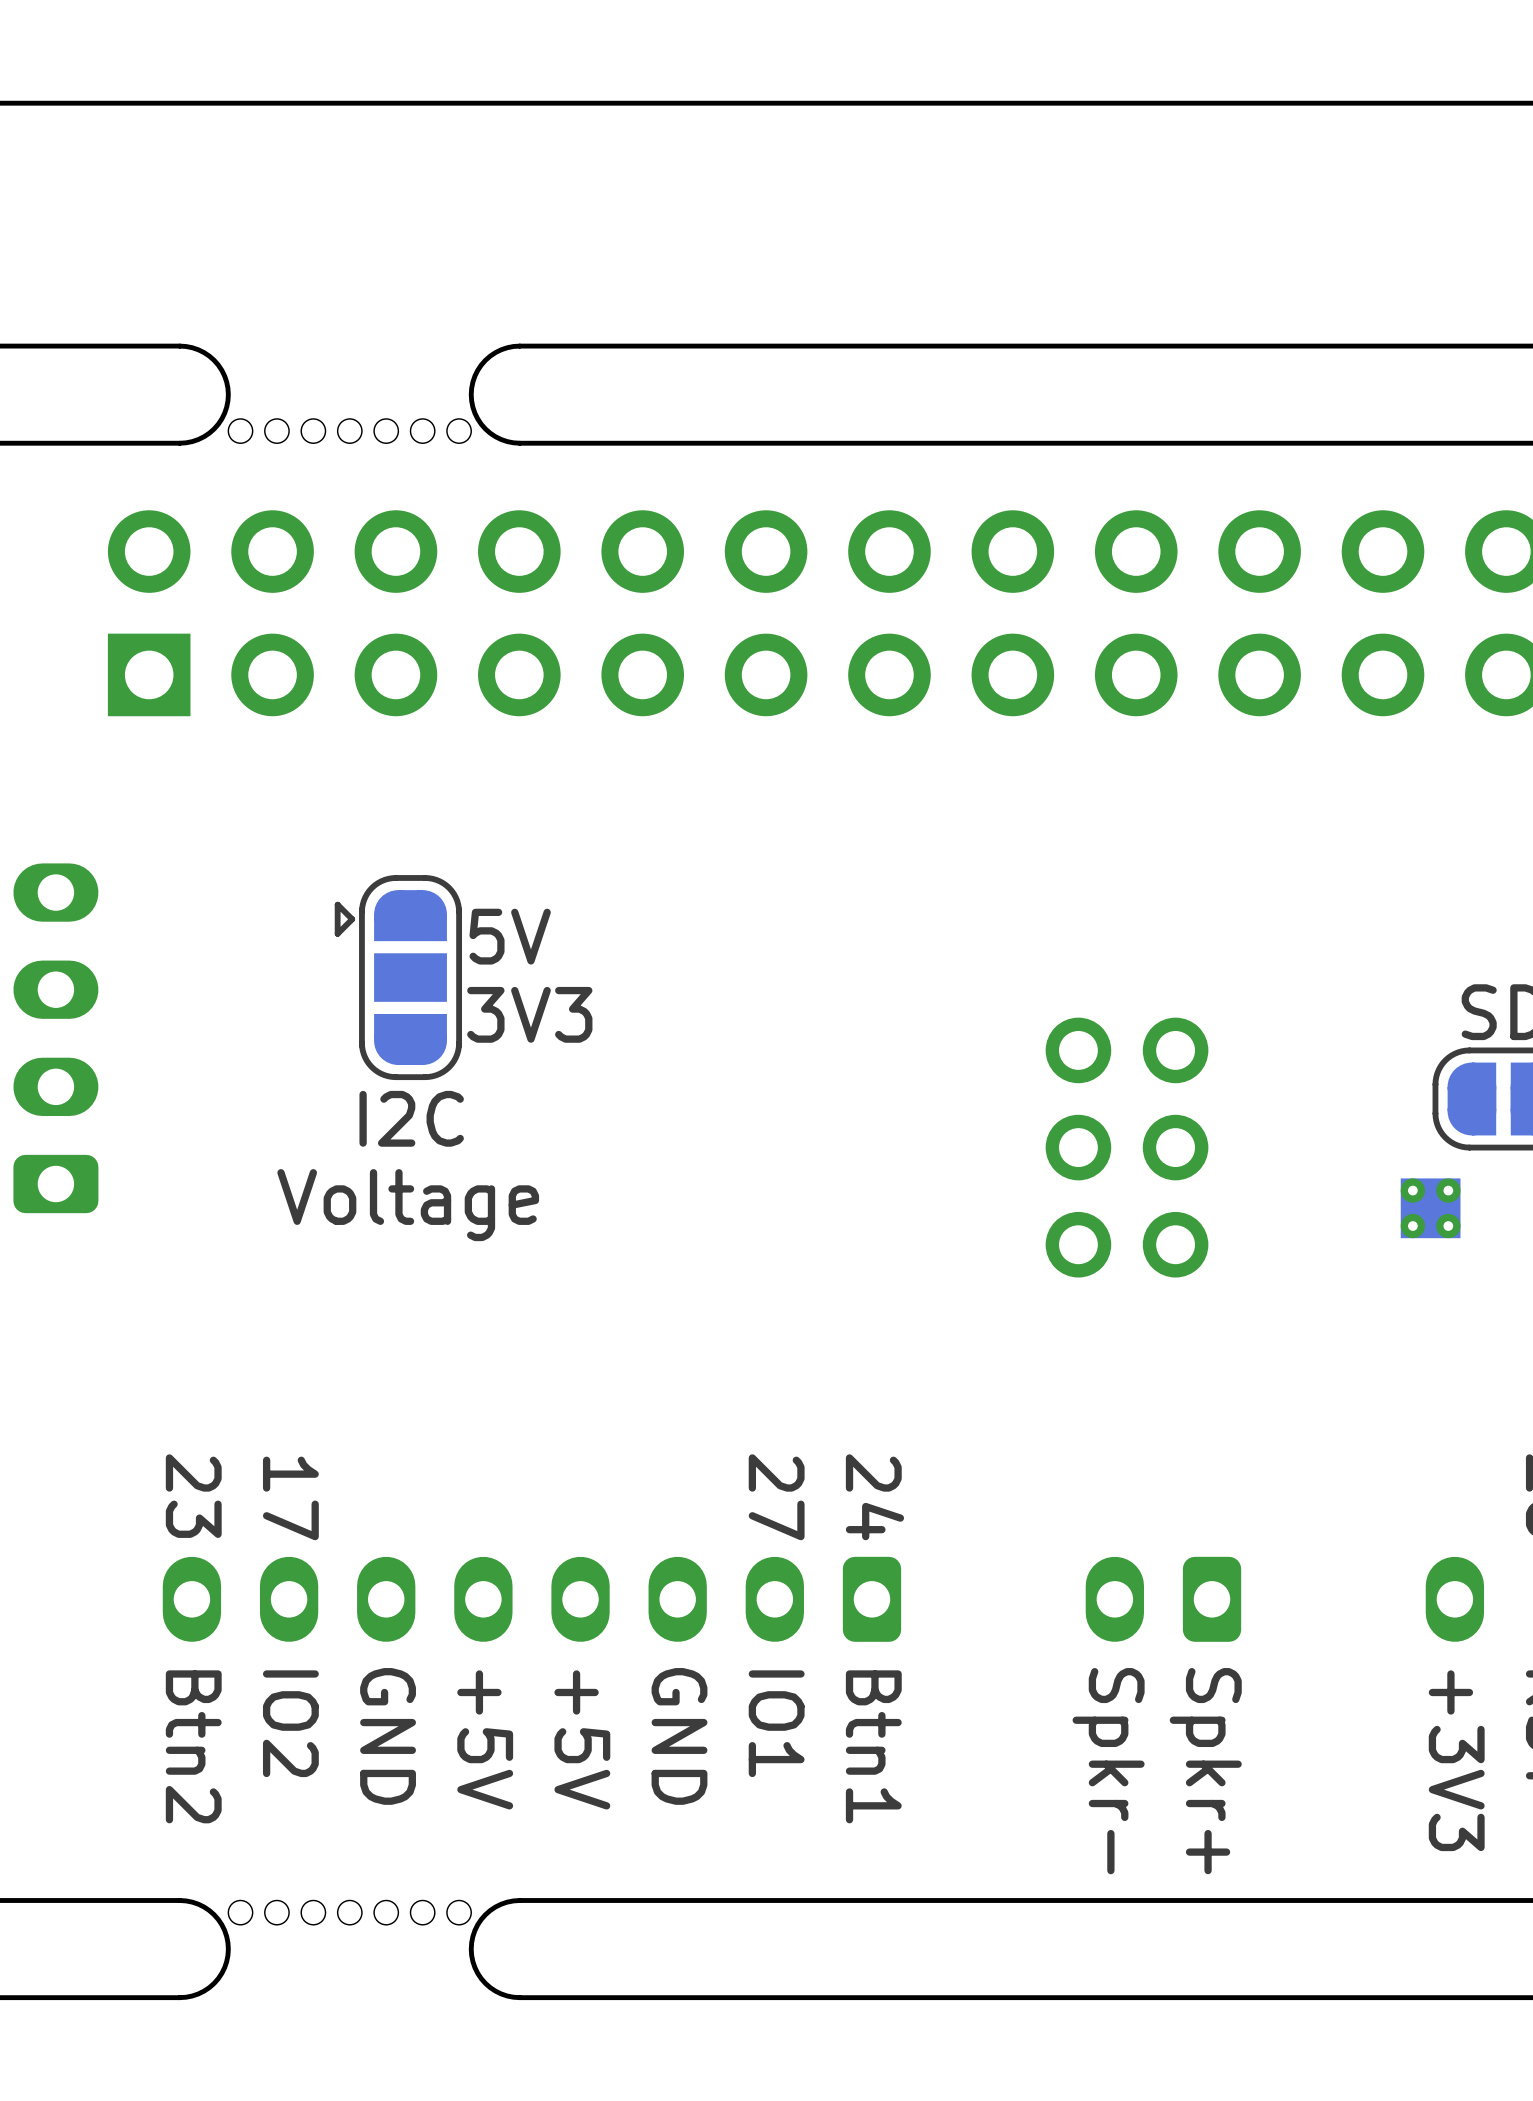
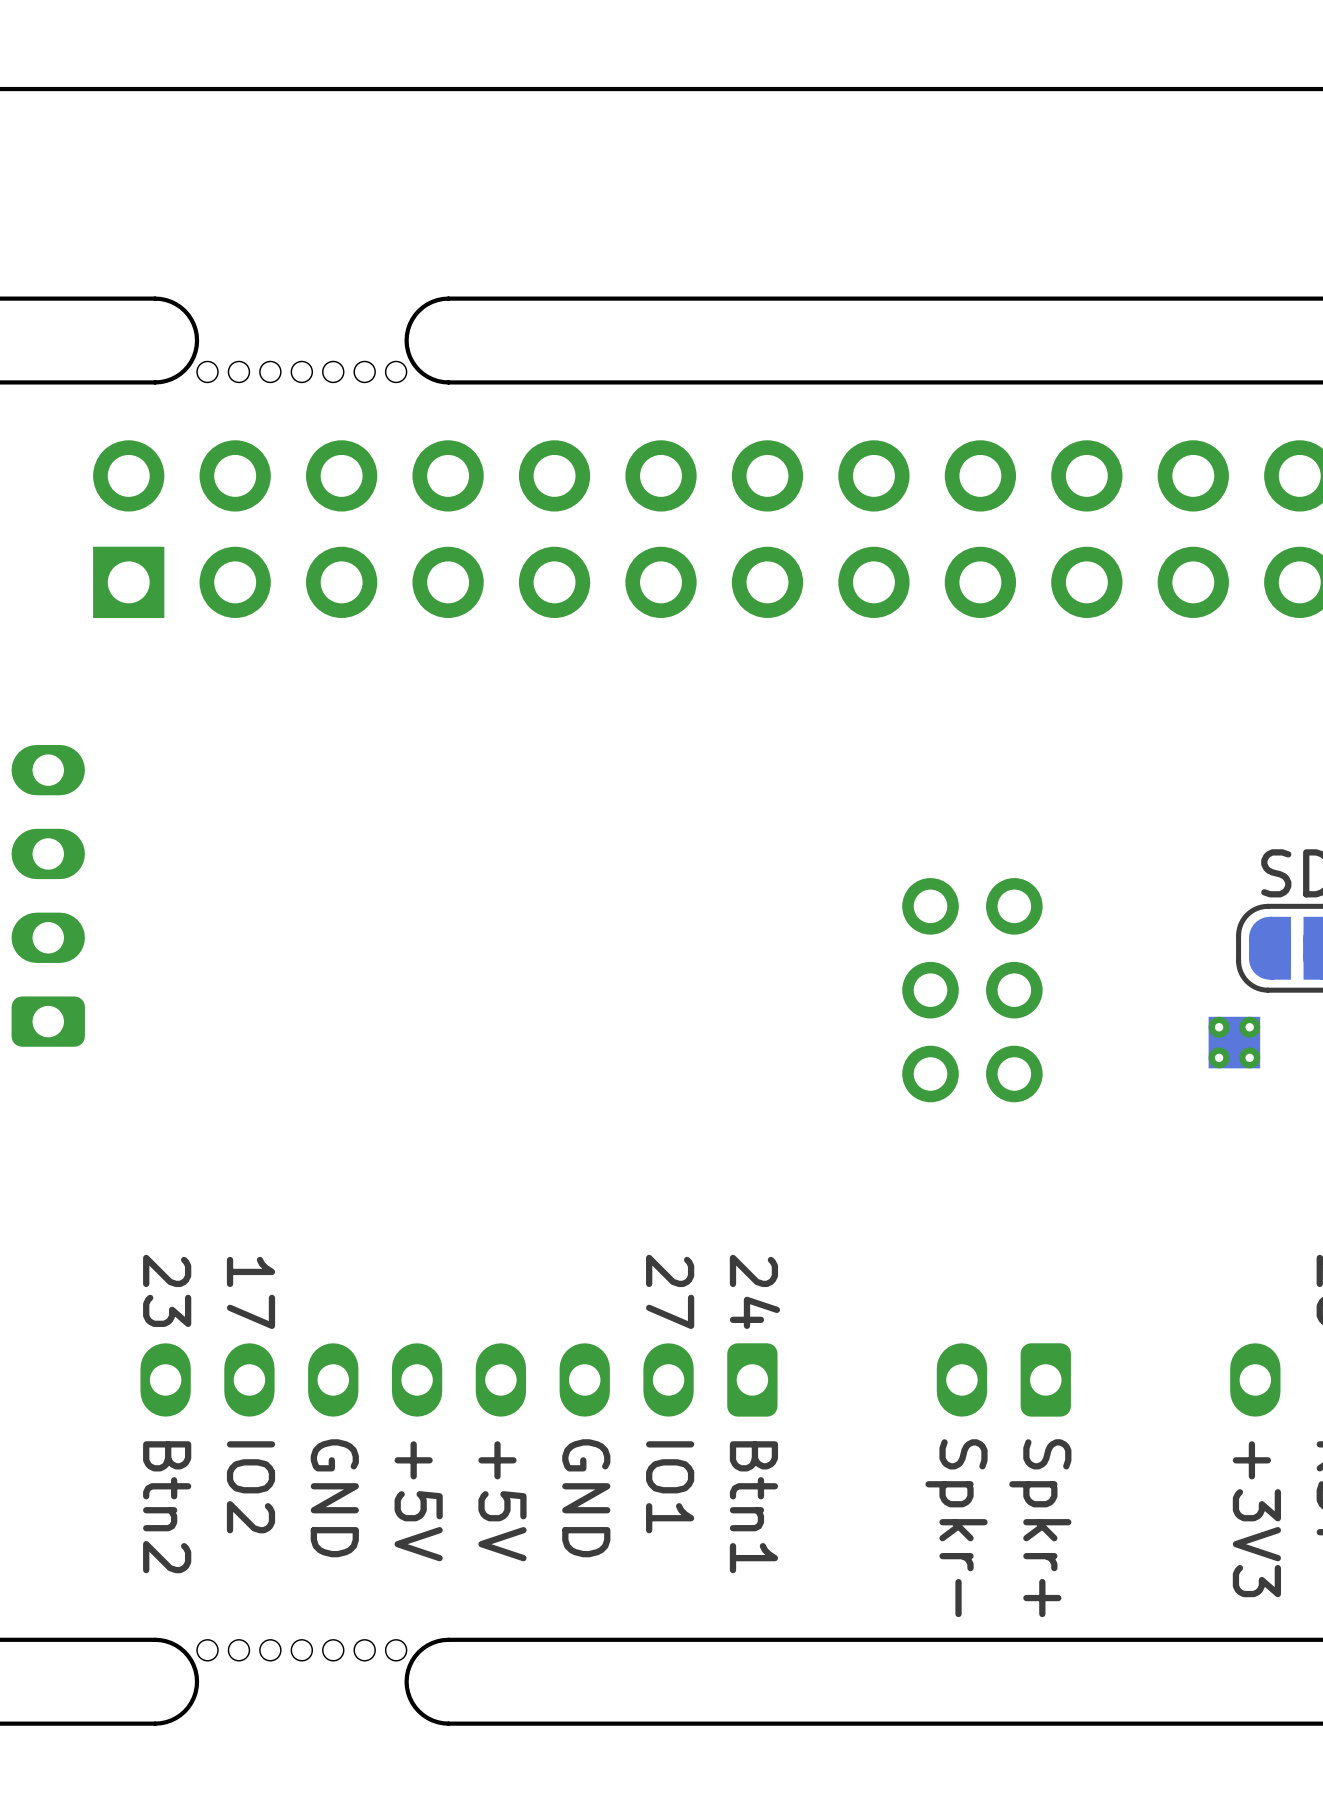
text: 5V (510, 936) -> none
part: (398, 977) -> none
text: 3V3 (529, 1014) -> none
text: I2C (411, 1118) -> none
text: Voltage (408, 1205) -> none

